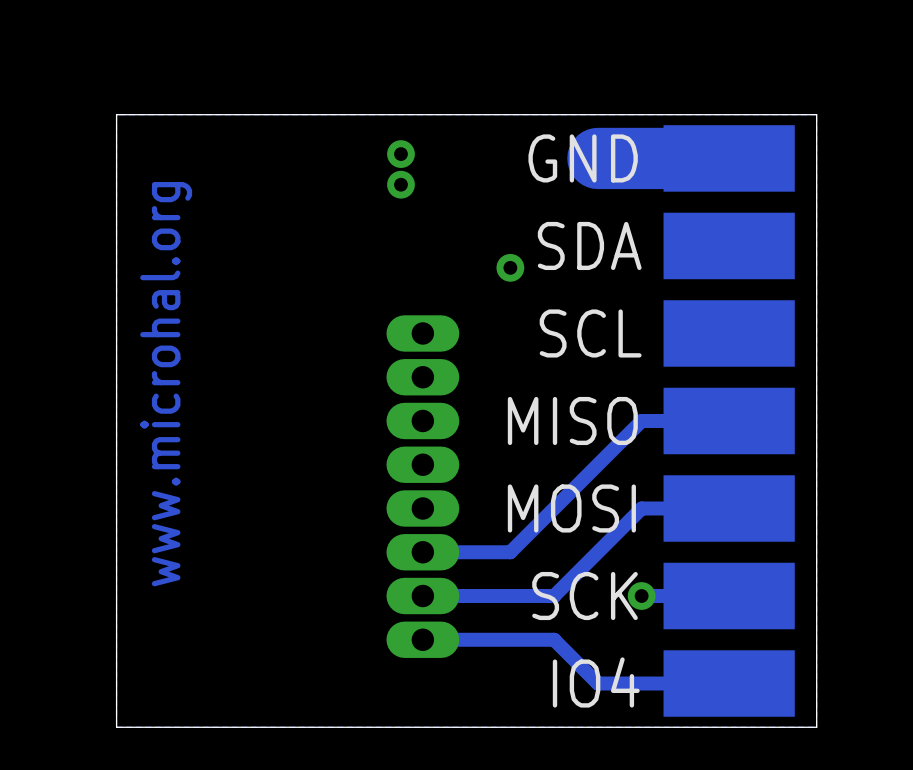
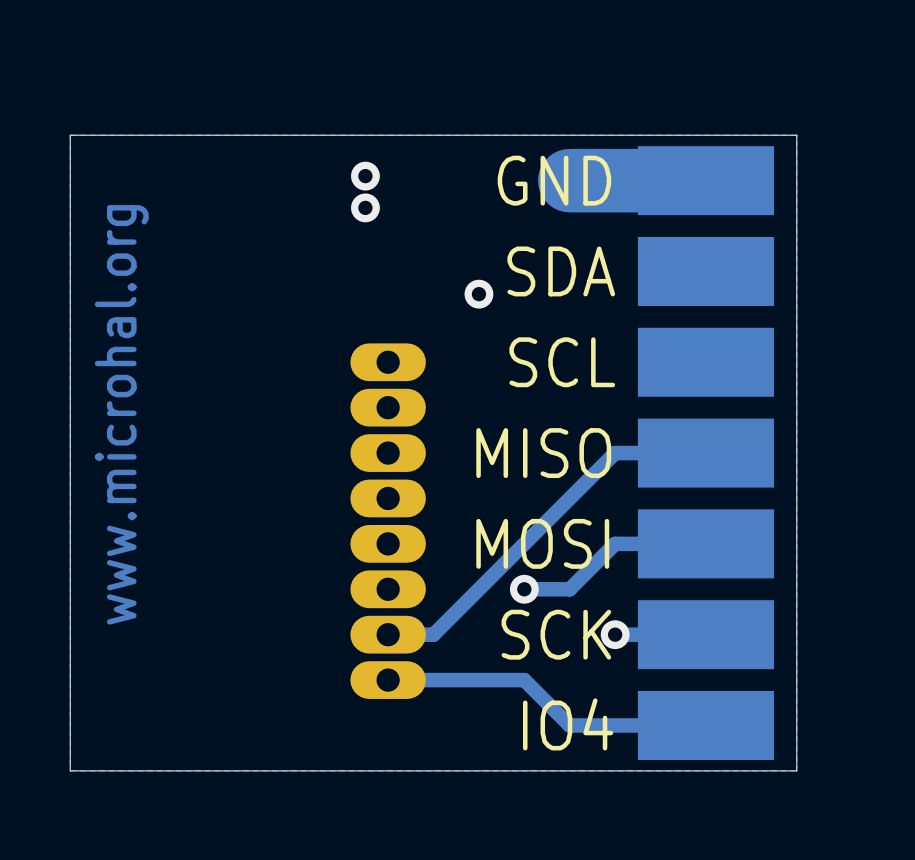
track: (510, 552) (422, 552) -> (478, 589) (433, 634)
via: none -> (524, 589)
track: (597, 552) (554, 596) (466, 596) -> (569, 589) (524, 589)

